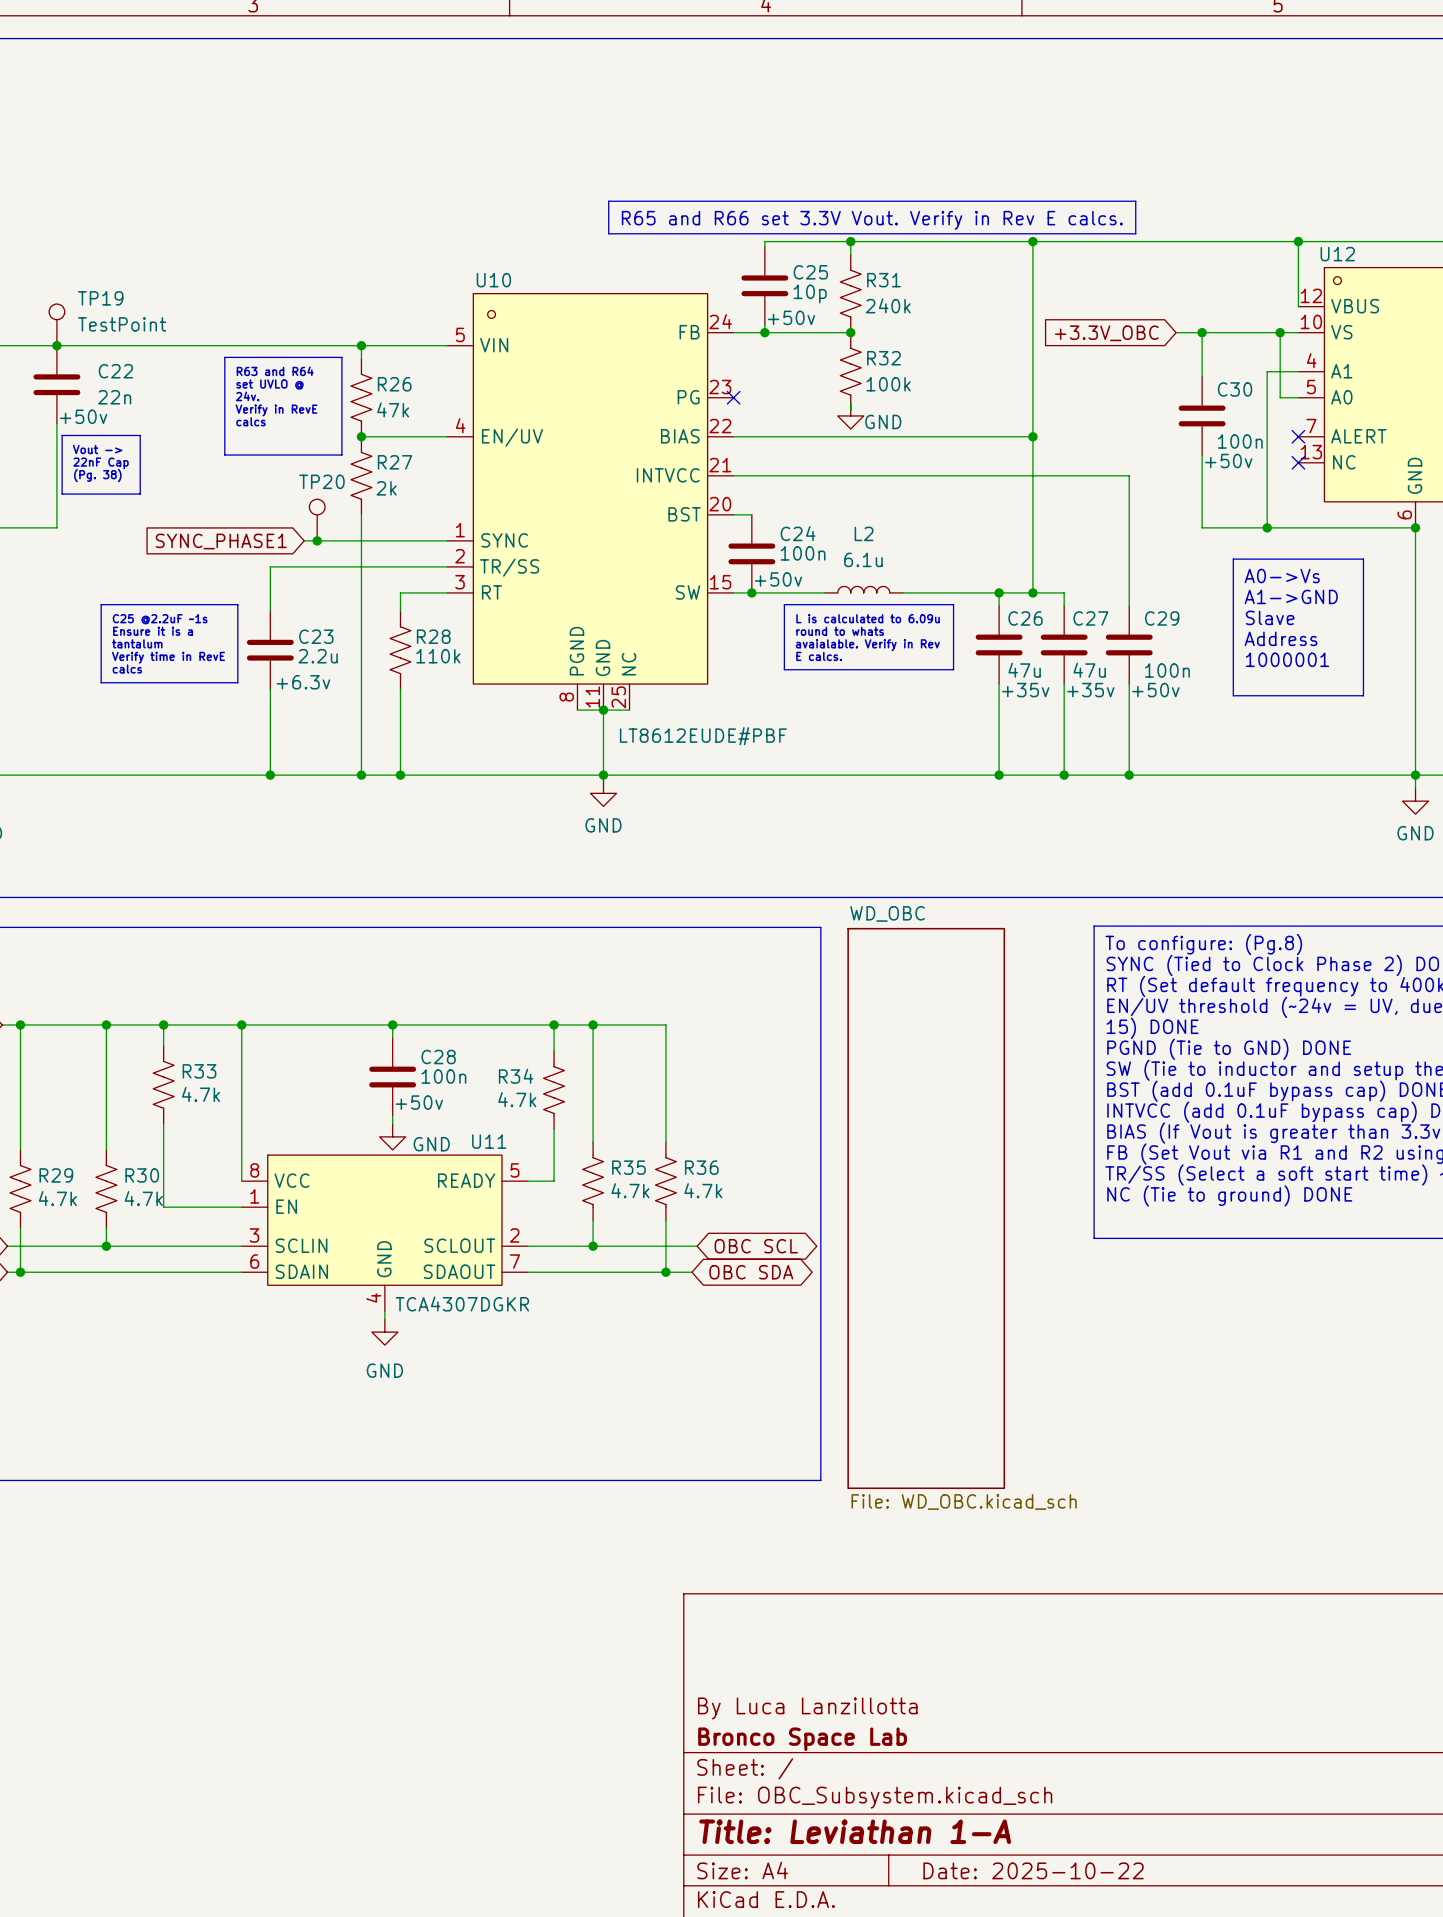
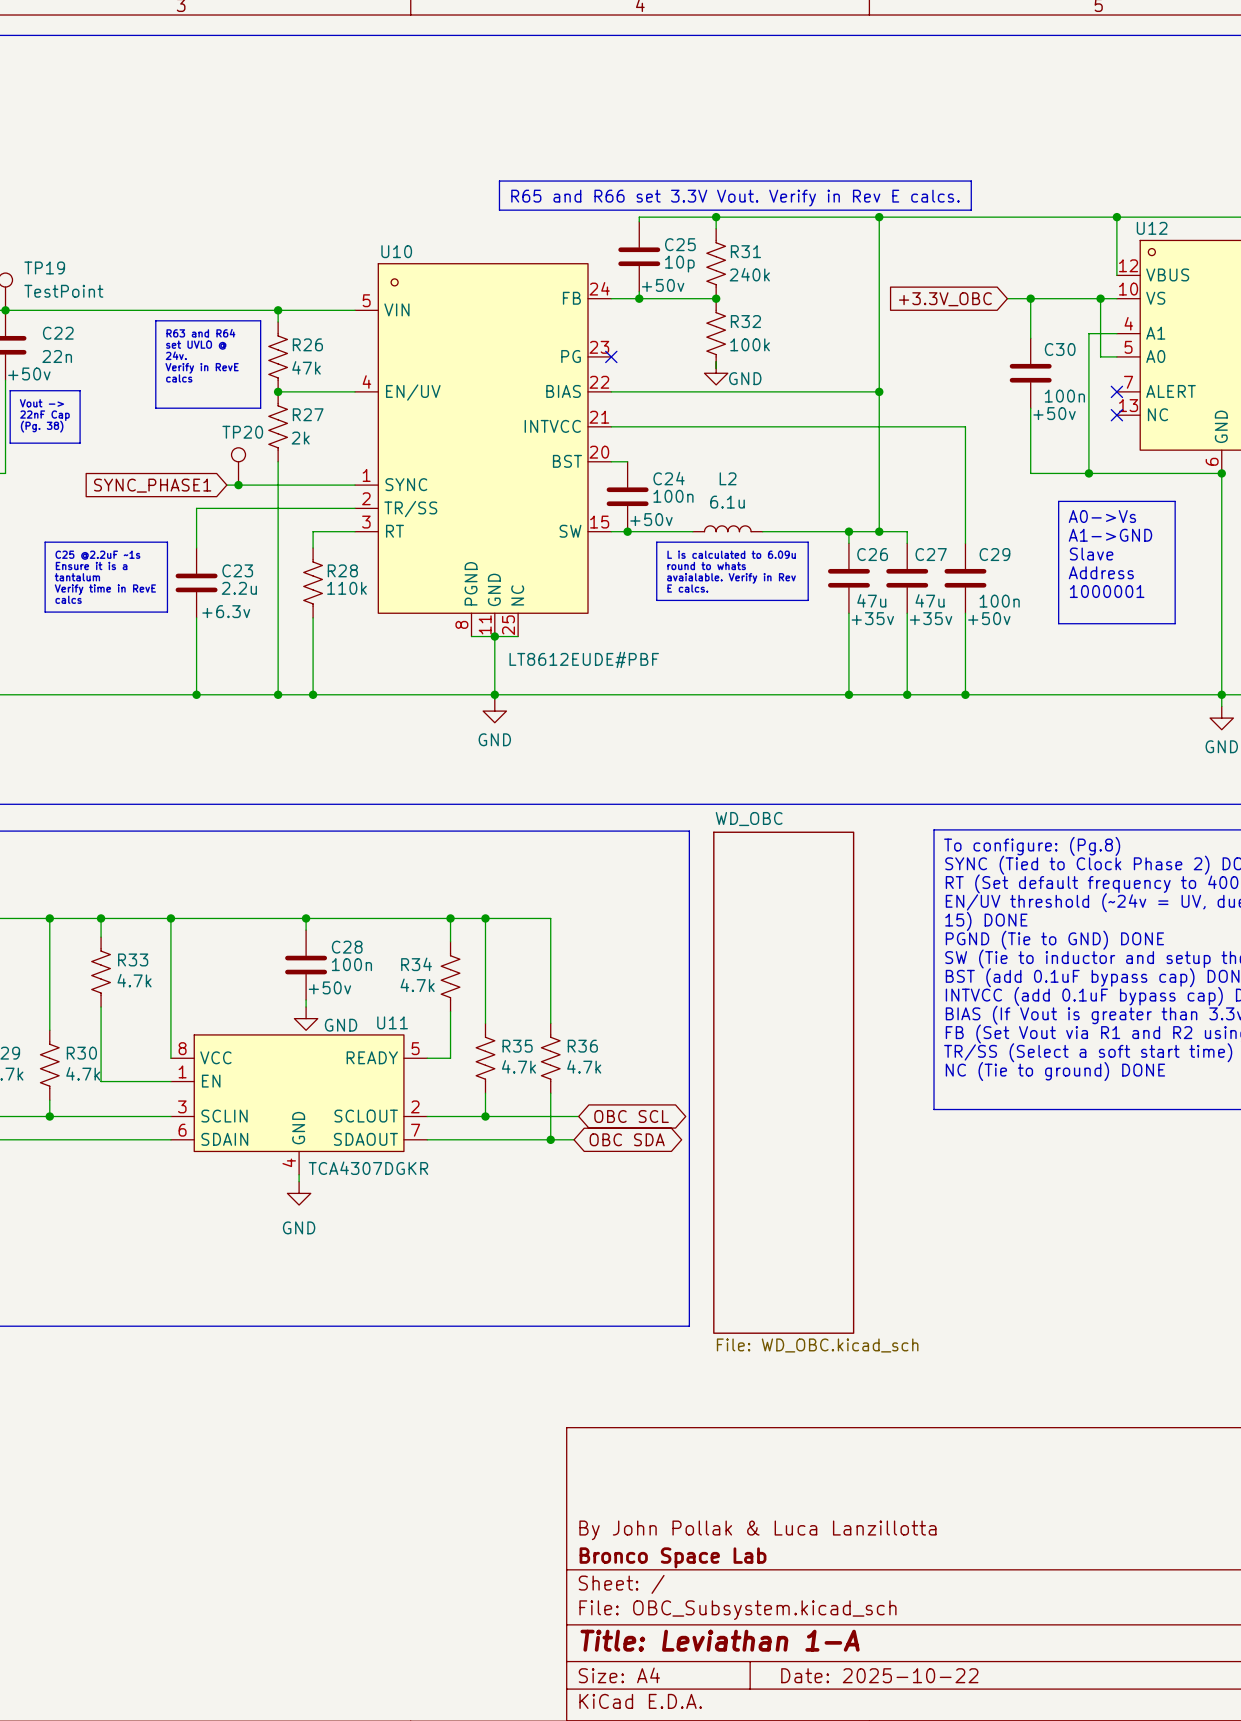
title block: By Luca Lanzillotta (807, 1708) -> By John Pollak & Luca Lanzillotta (757, 1530)

